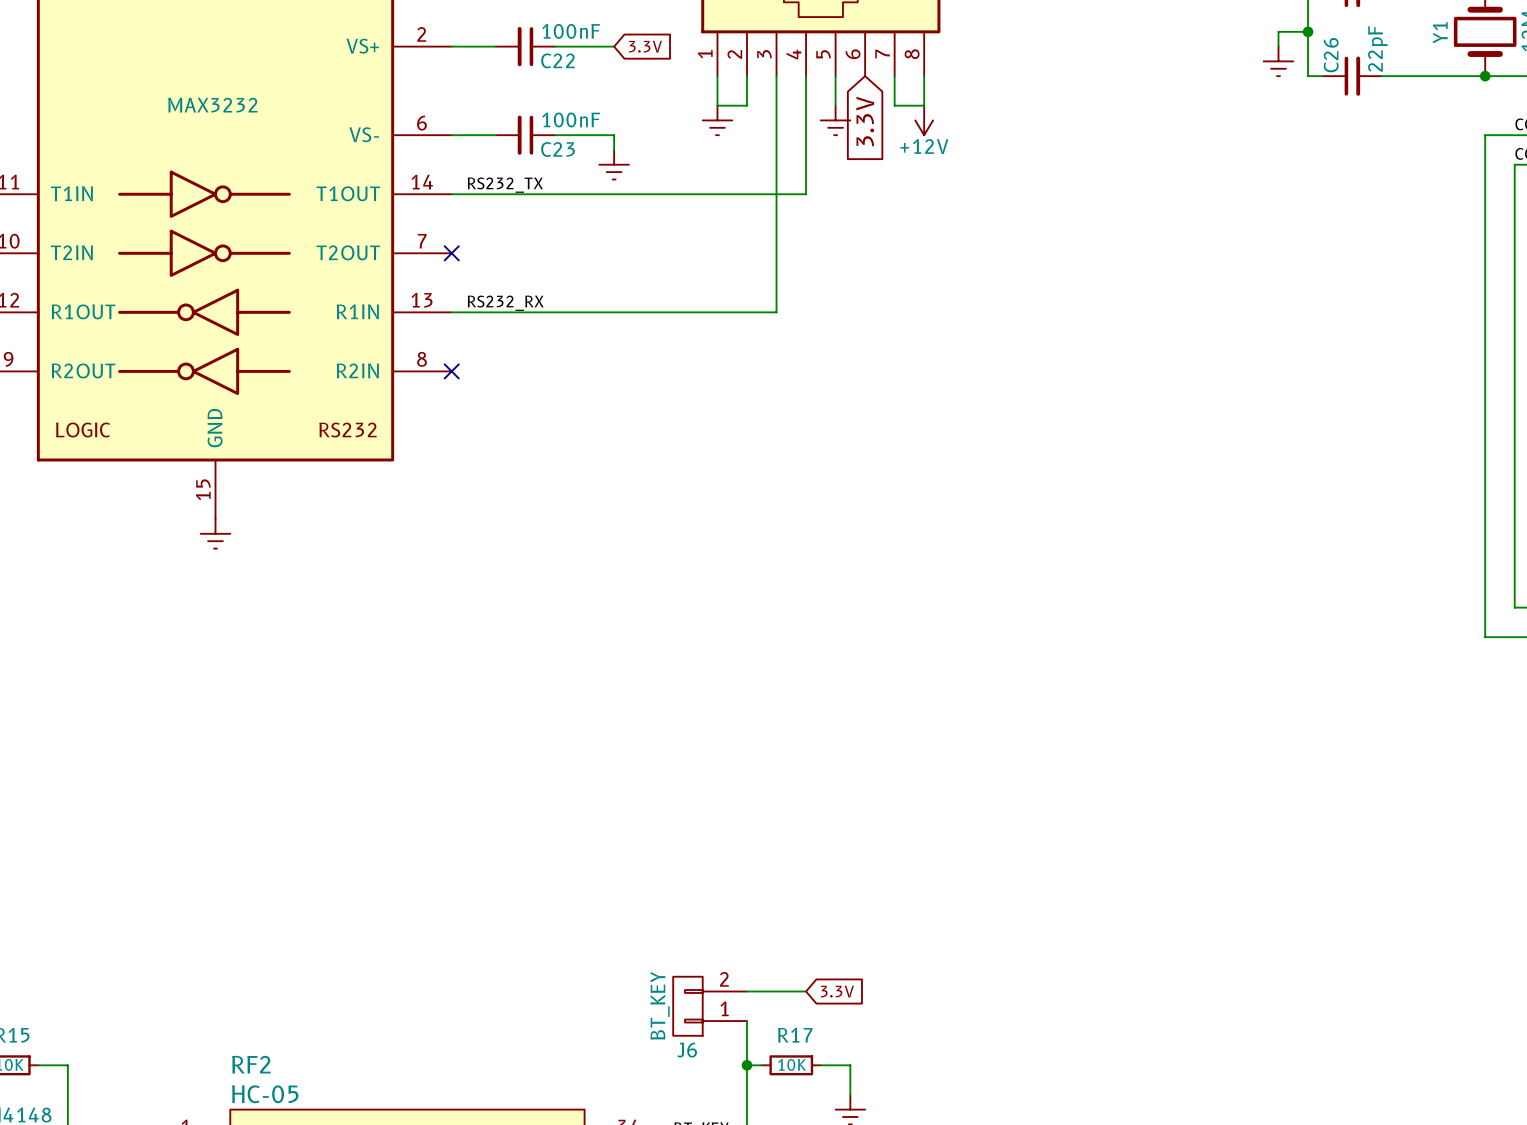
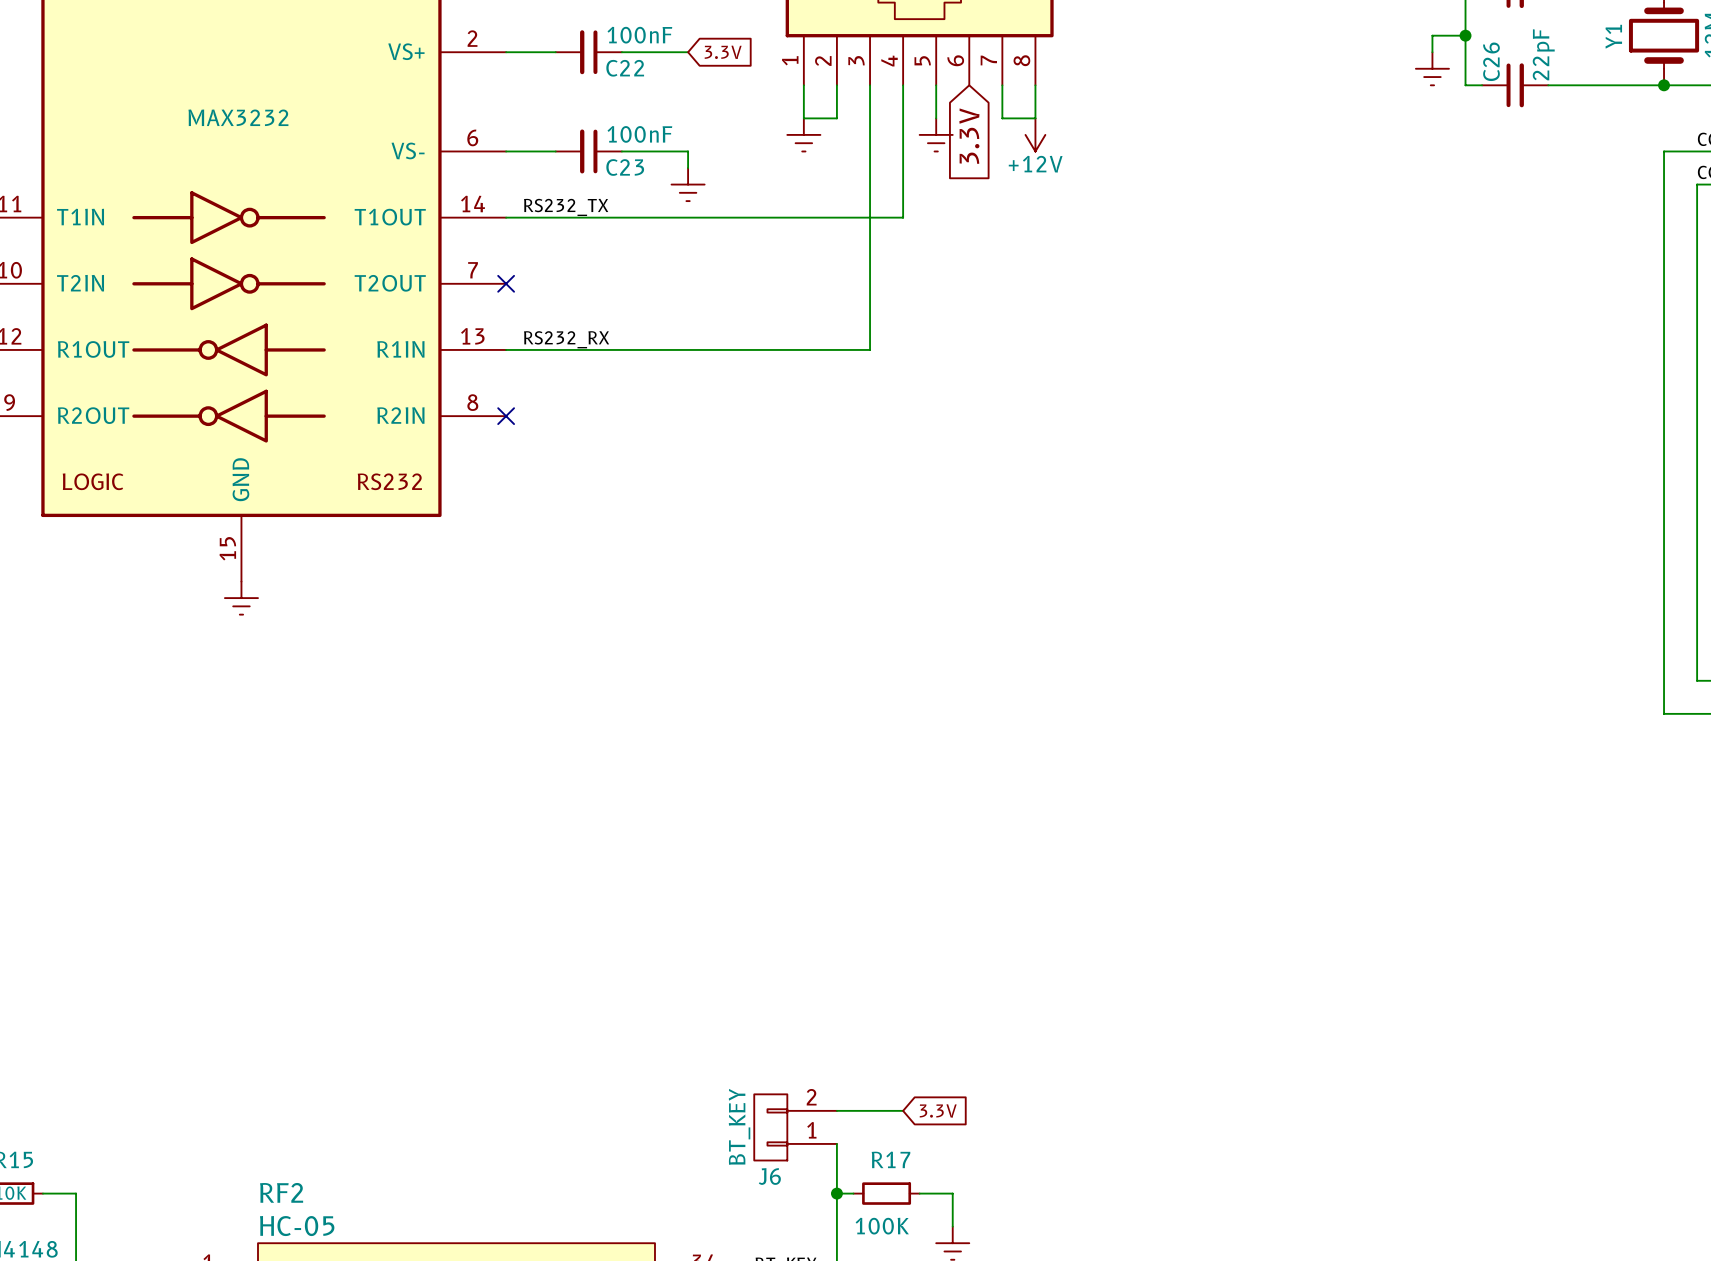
R17 value: 10K (792, 1064) -> 100K (882, 1226)

